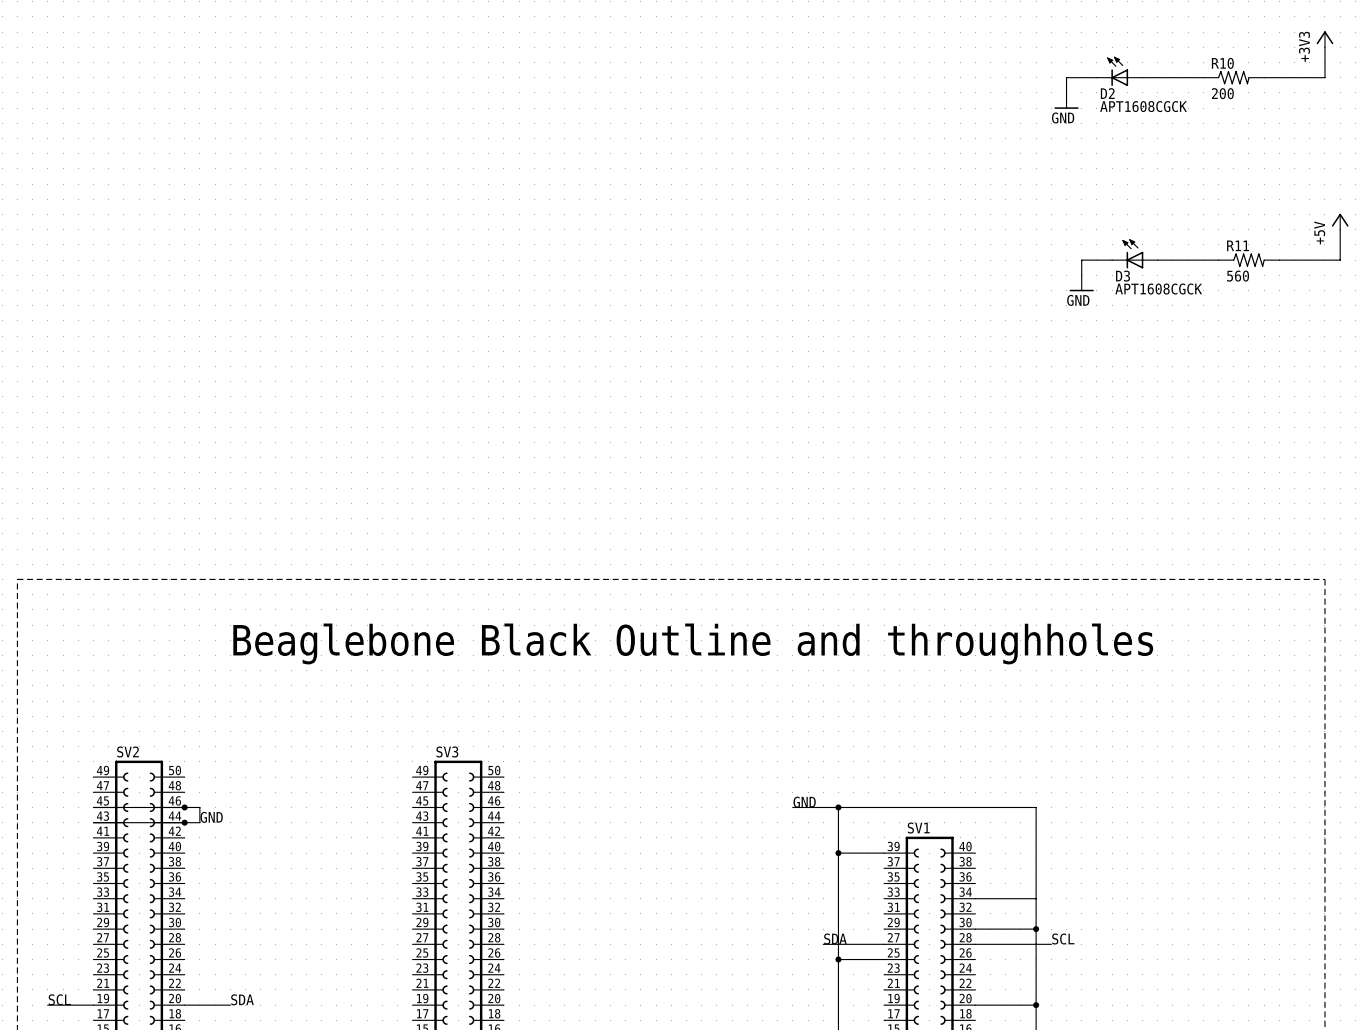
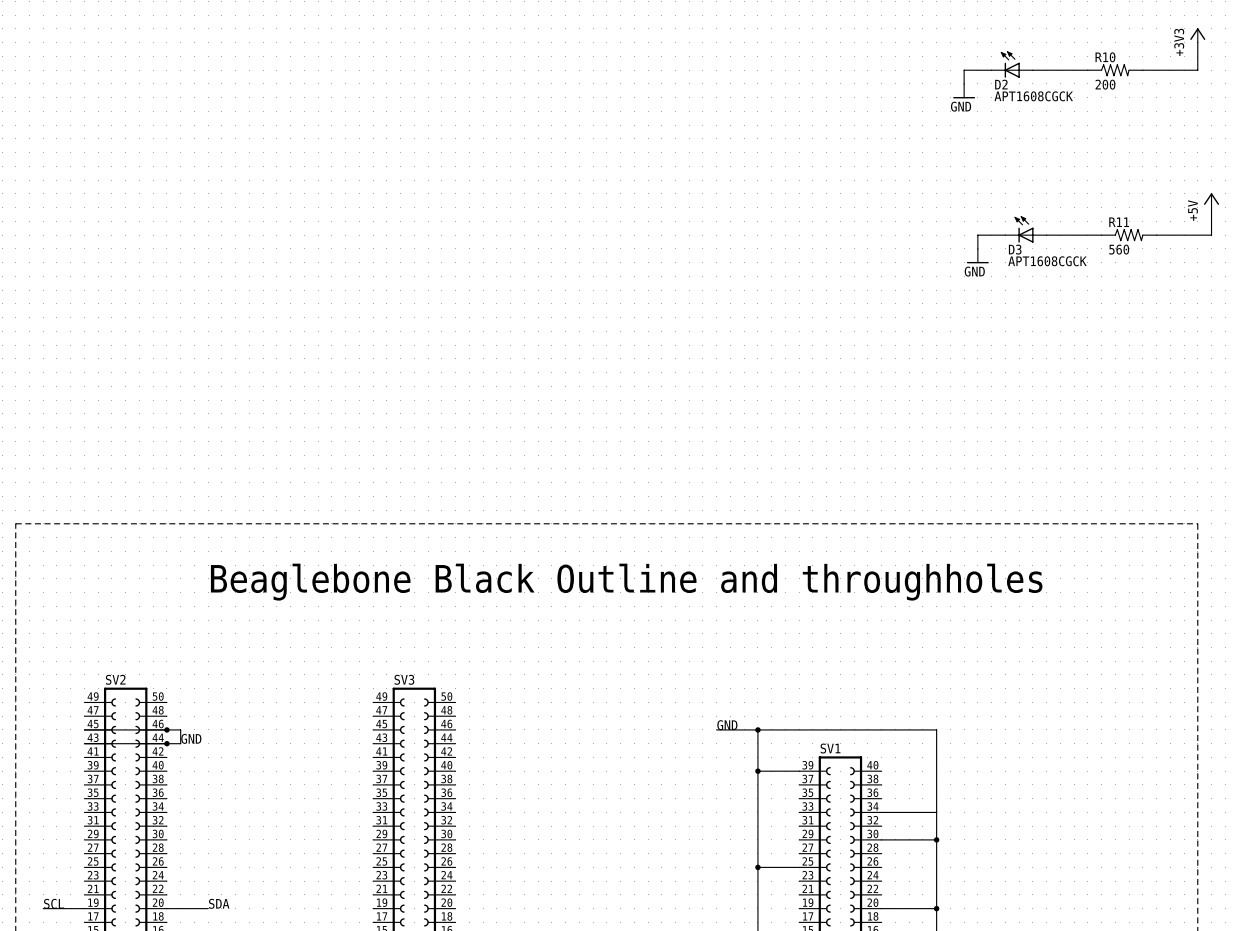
label: SDA (835, 939) -> none
label: SCL (1063, 939) -> none
wire: (823, 944) (884, 944) -> none
wire: (975, 944) (1051, 944) -> none

